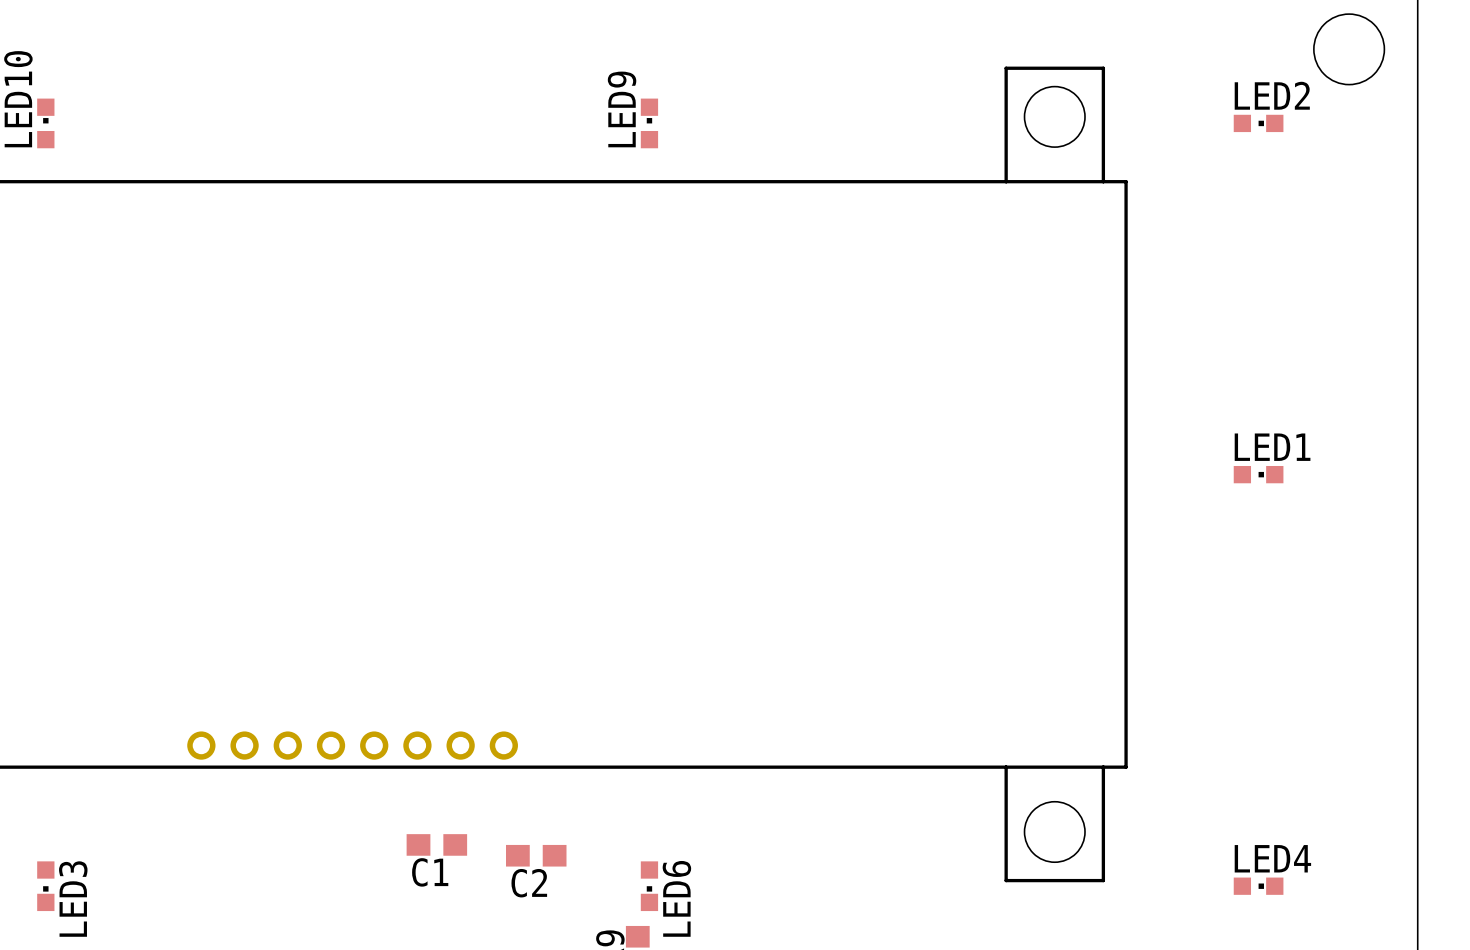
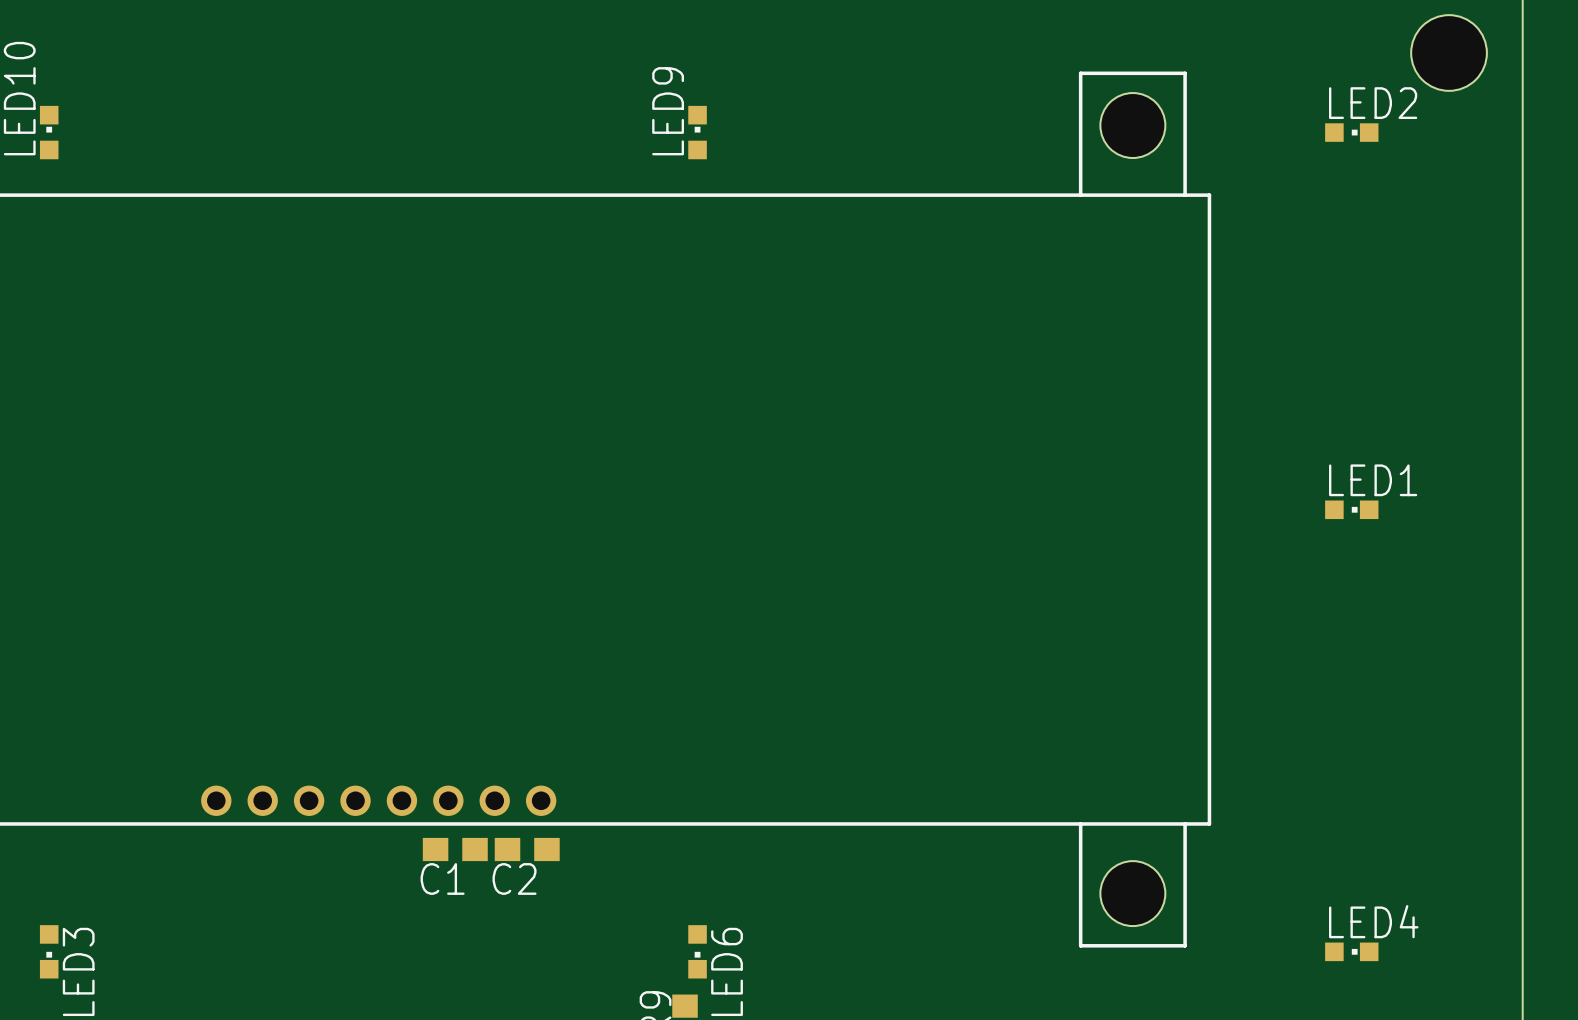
C1 position: (436, 844) -> (455, 849)
C2 position: (536, 855) -> (527, 849)

